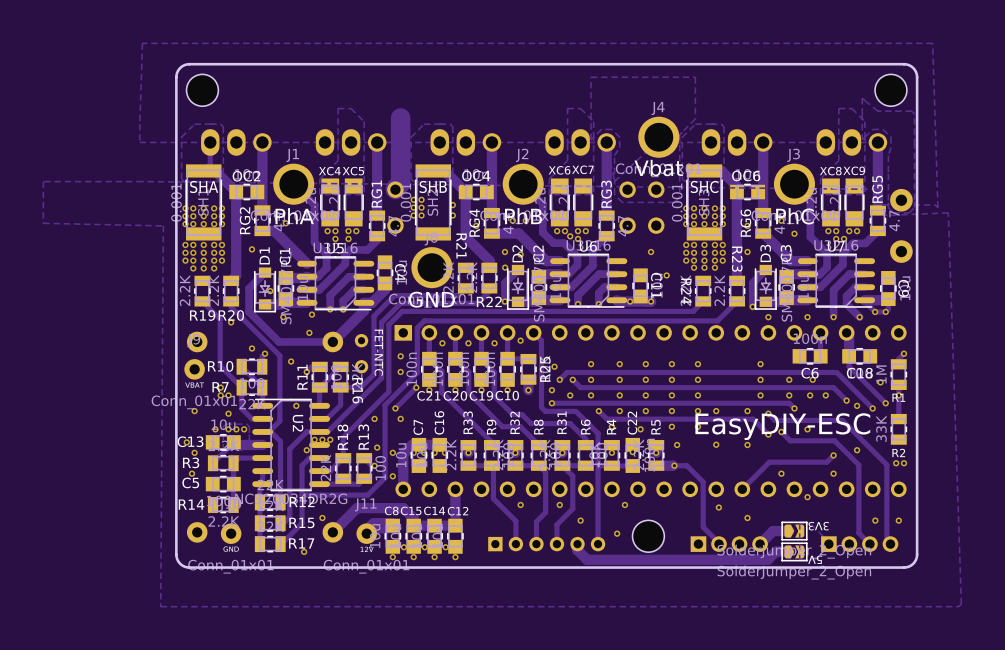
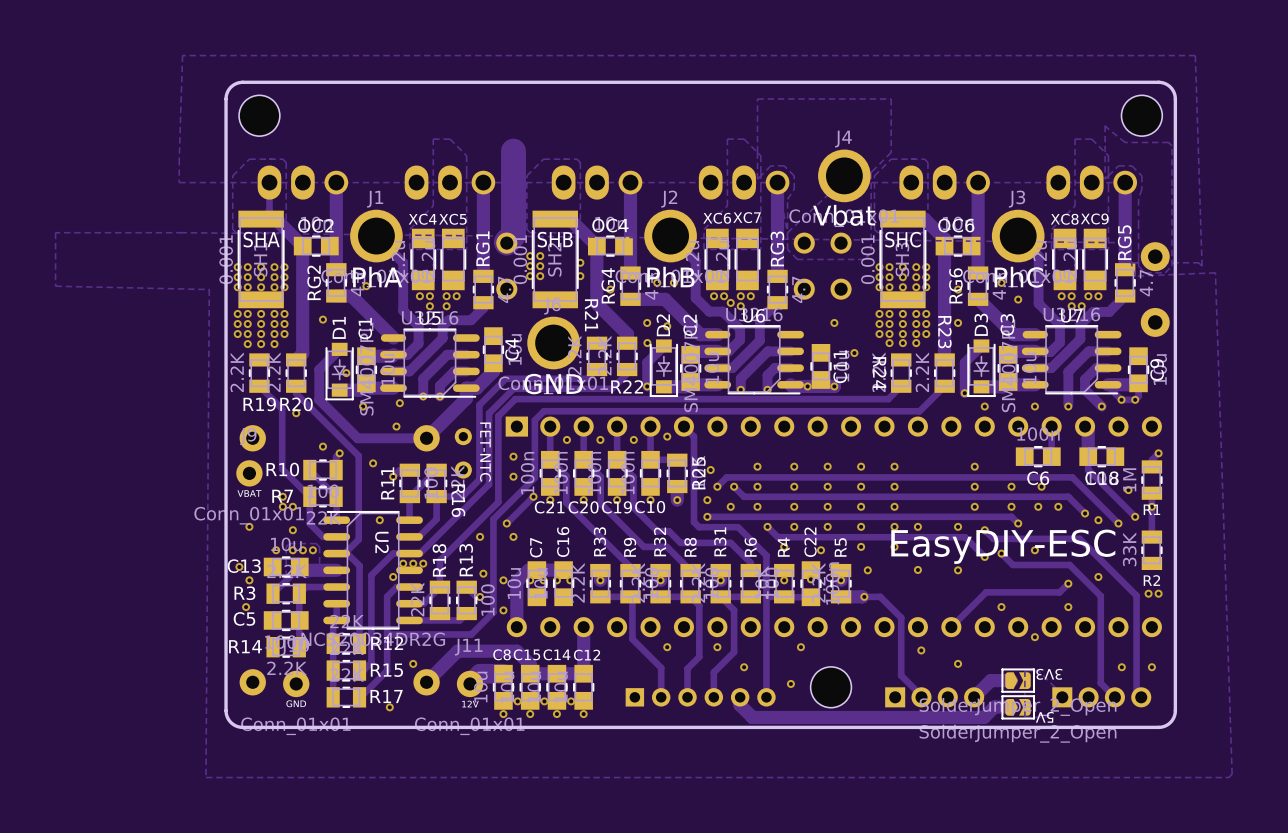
C4 name rotation: 0° (400, 272) -> 180° (512, 349)
C11 name rotation: 0° (656, 285) -> 180° (840, 366)
C9 name rotation: 0° (903, 288) -> 180° (1157, 369)

